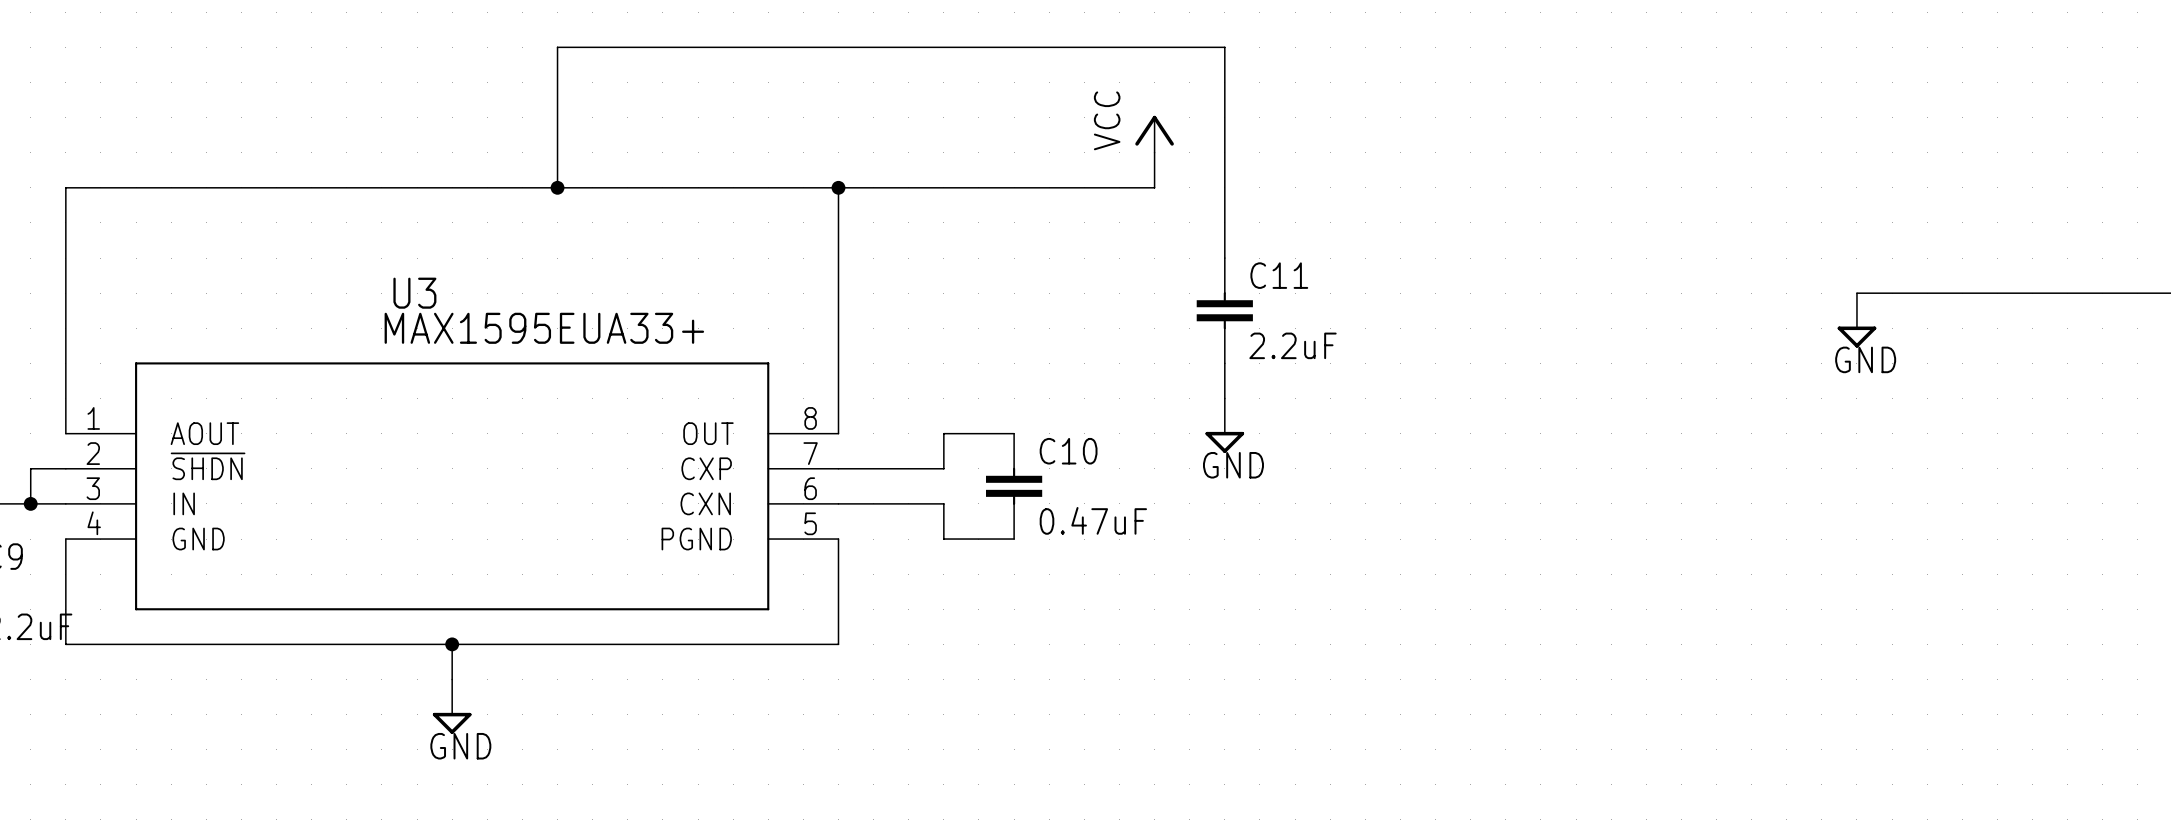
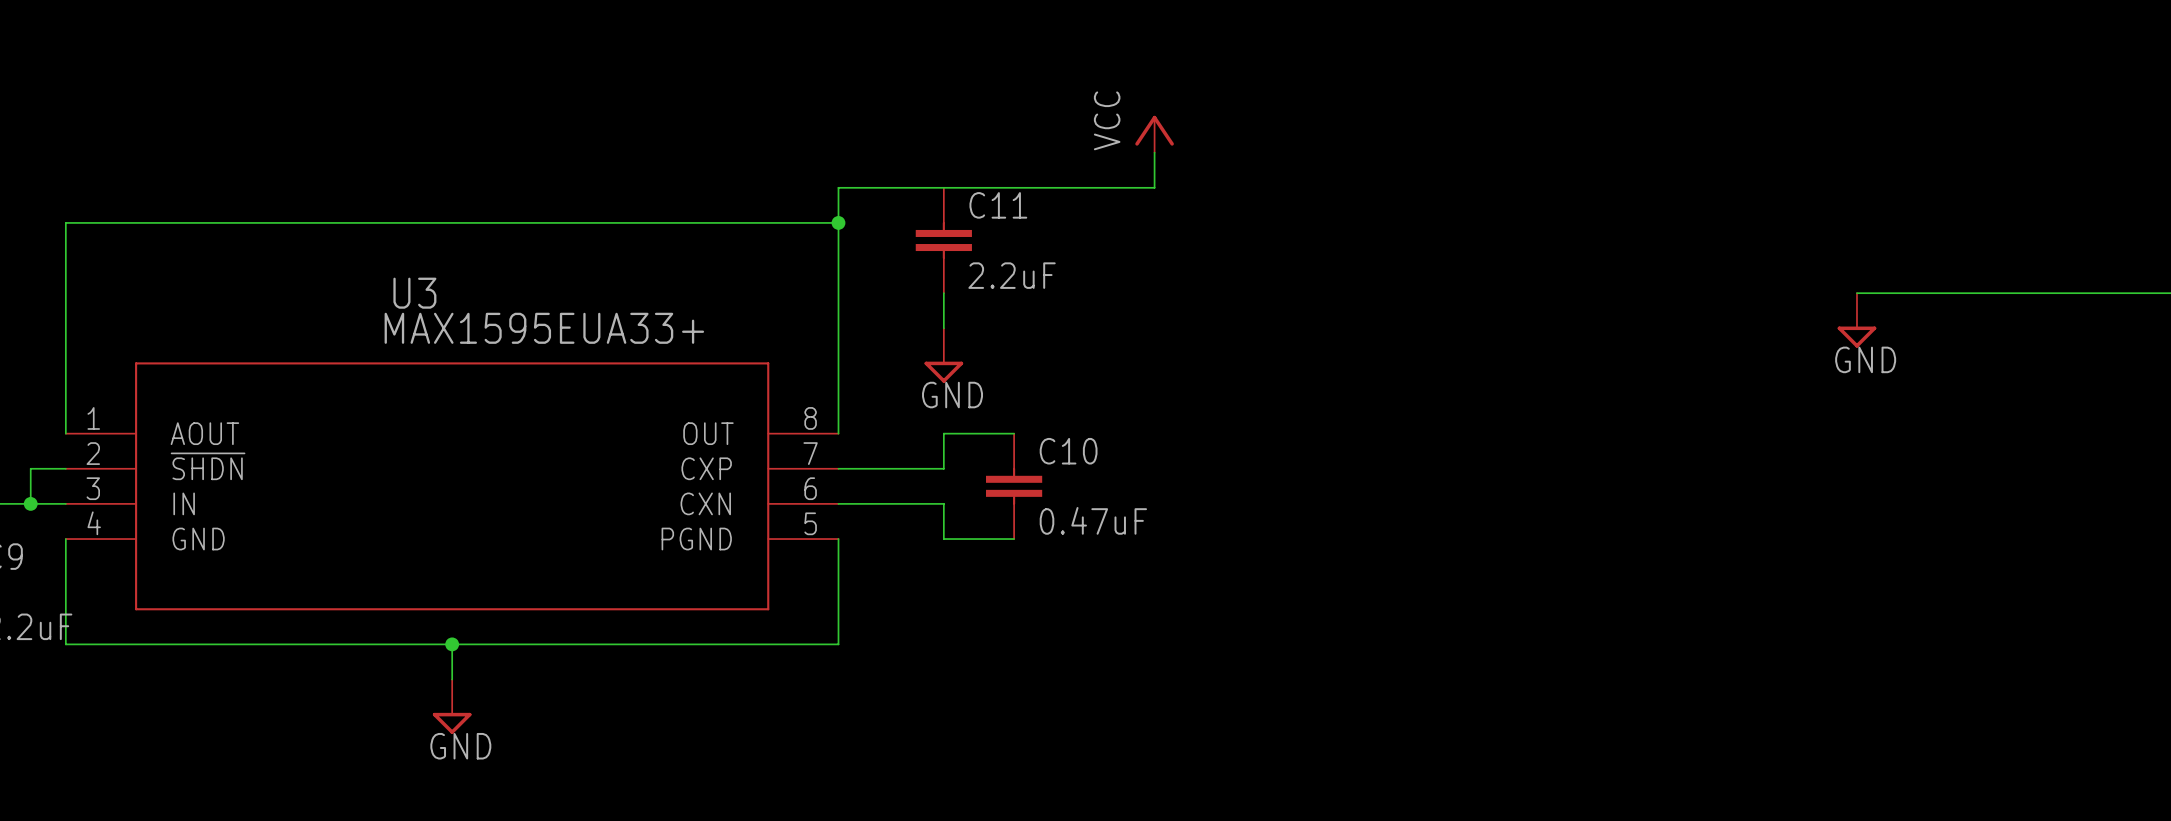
wire: (557, 187) (557, 47) (1224, 47) (1224, 258) -> none
junction: (557, 187) -> none
wire: (838, 187) (65, 187) (65, 222) -> (838, 222) (65, 222)
junction position: (838, 187) -> (838, 222)
C11 position: (1224, 310) -> (943, 240)
wire: (1224, 363) (1224, 398) -> (943, 293) (943, 328)
power symbol position: GND (1224, 425) -> GND (943, 355)

